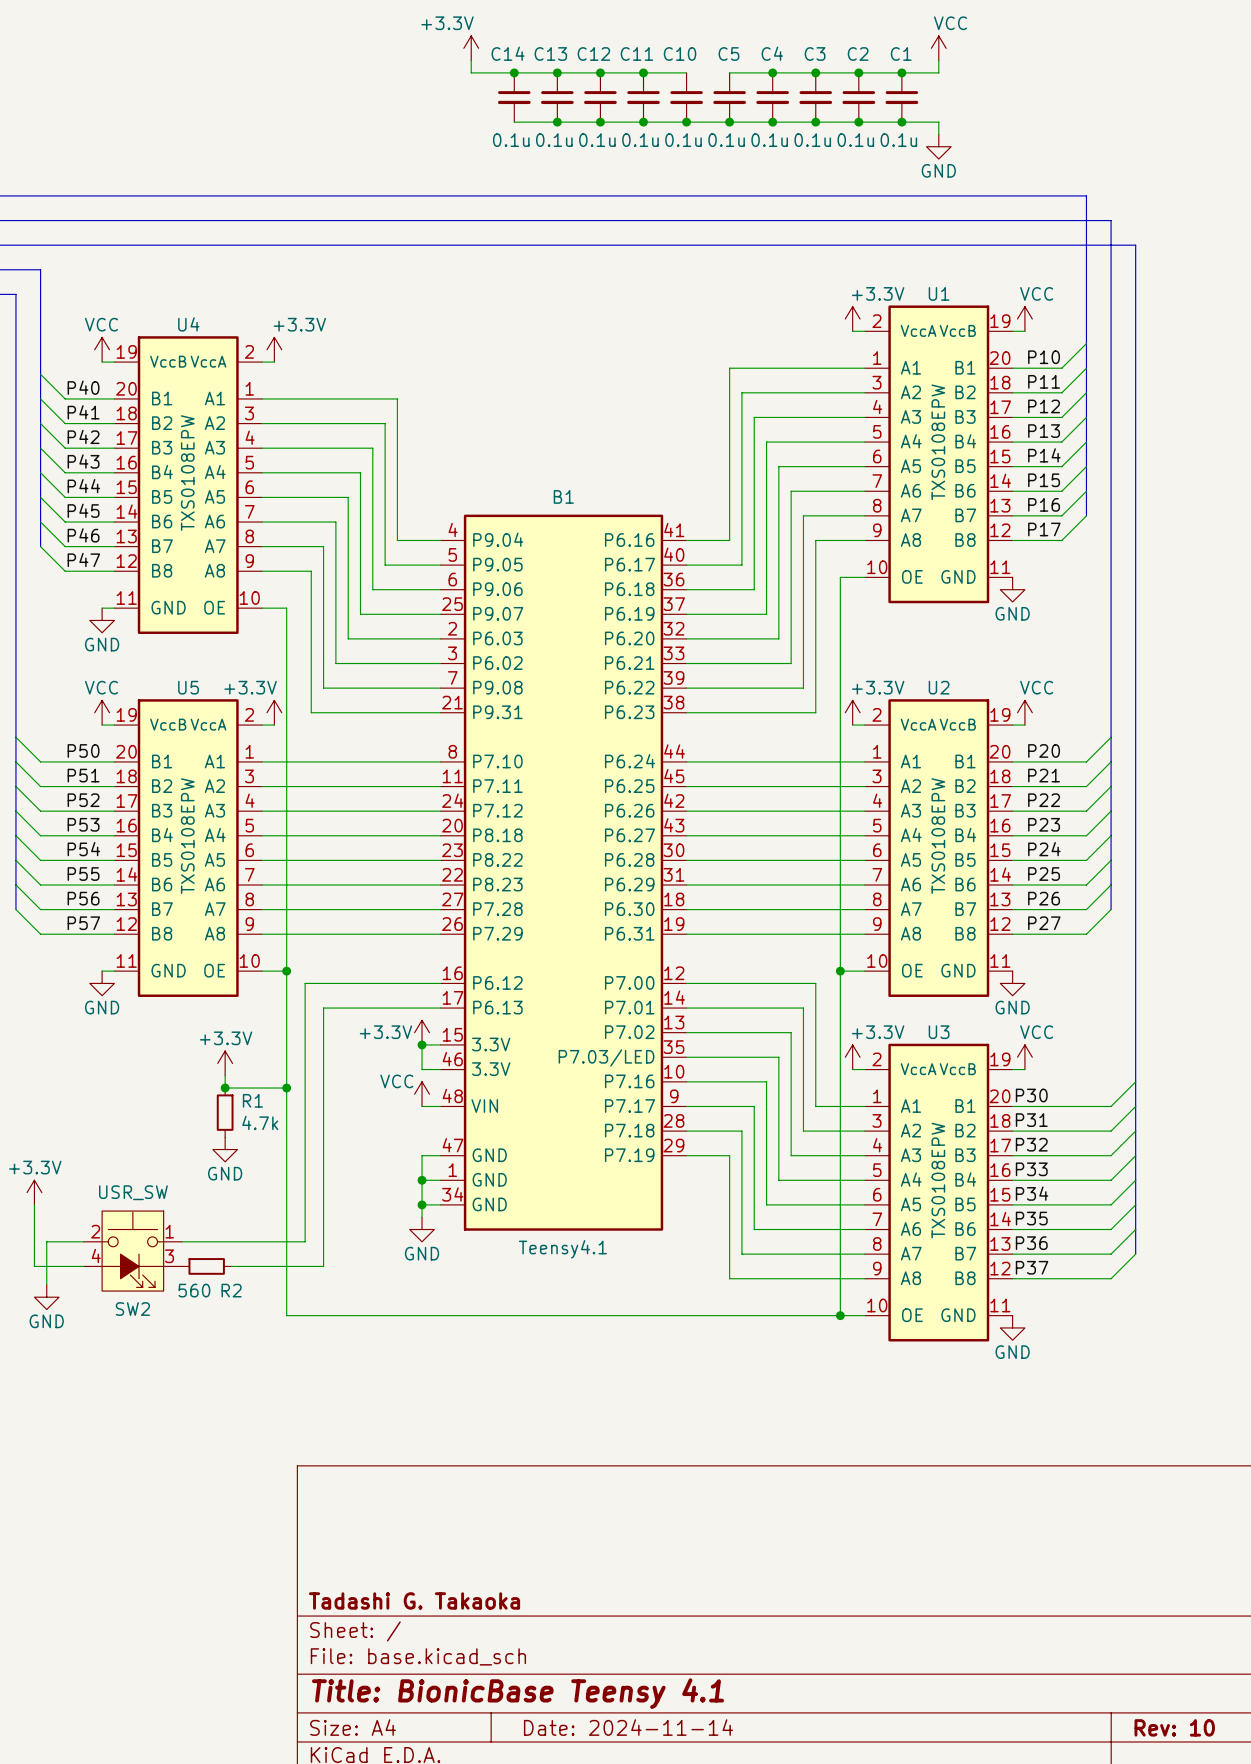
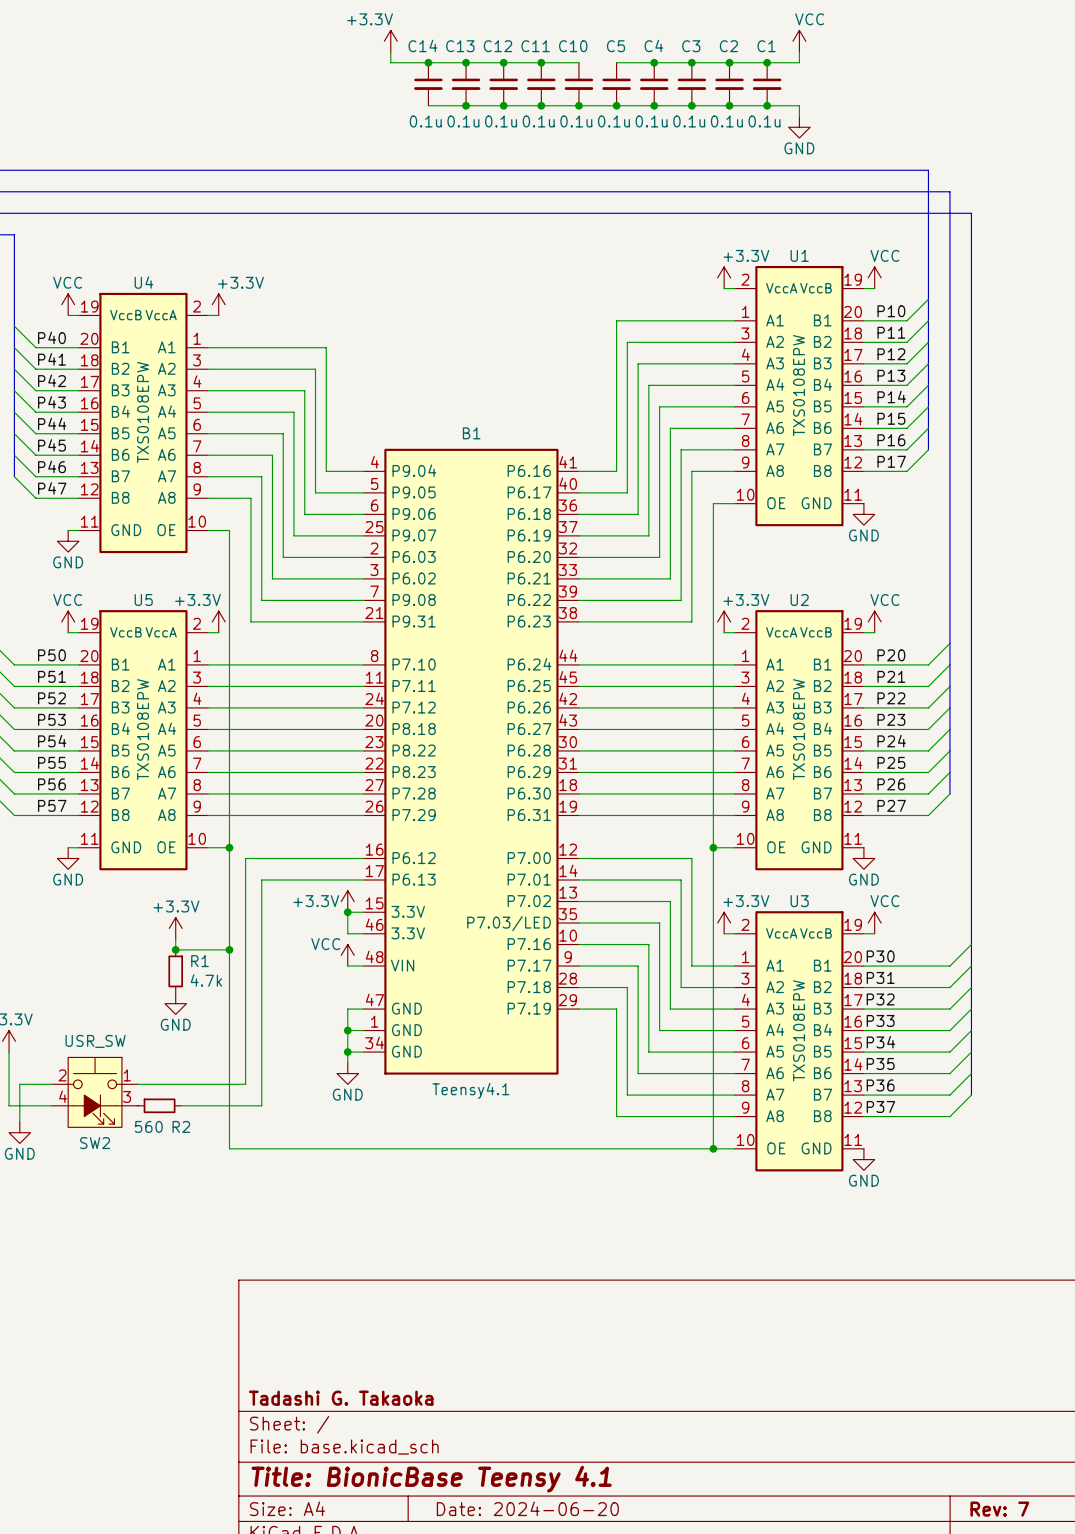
title block: Date: 2024-11-14 (628, 1727) -> Date: 2024-06-20 (527, 1508)
title block: Rev: 10 (1174, 1727) -> Rev: 7 (999, 1509)

